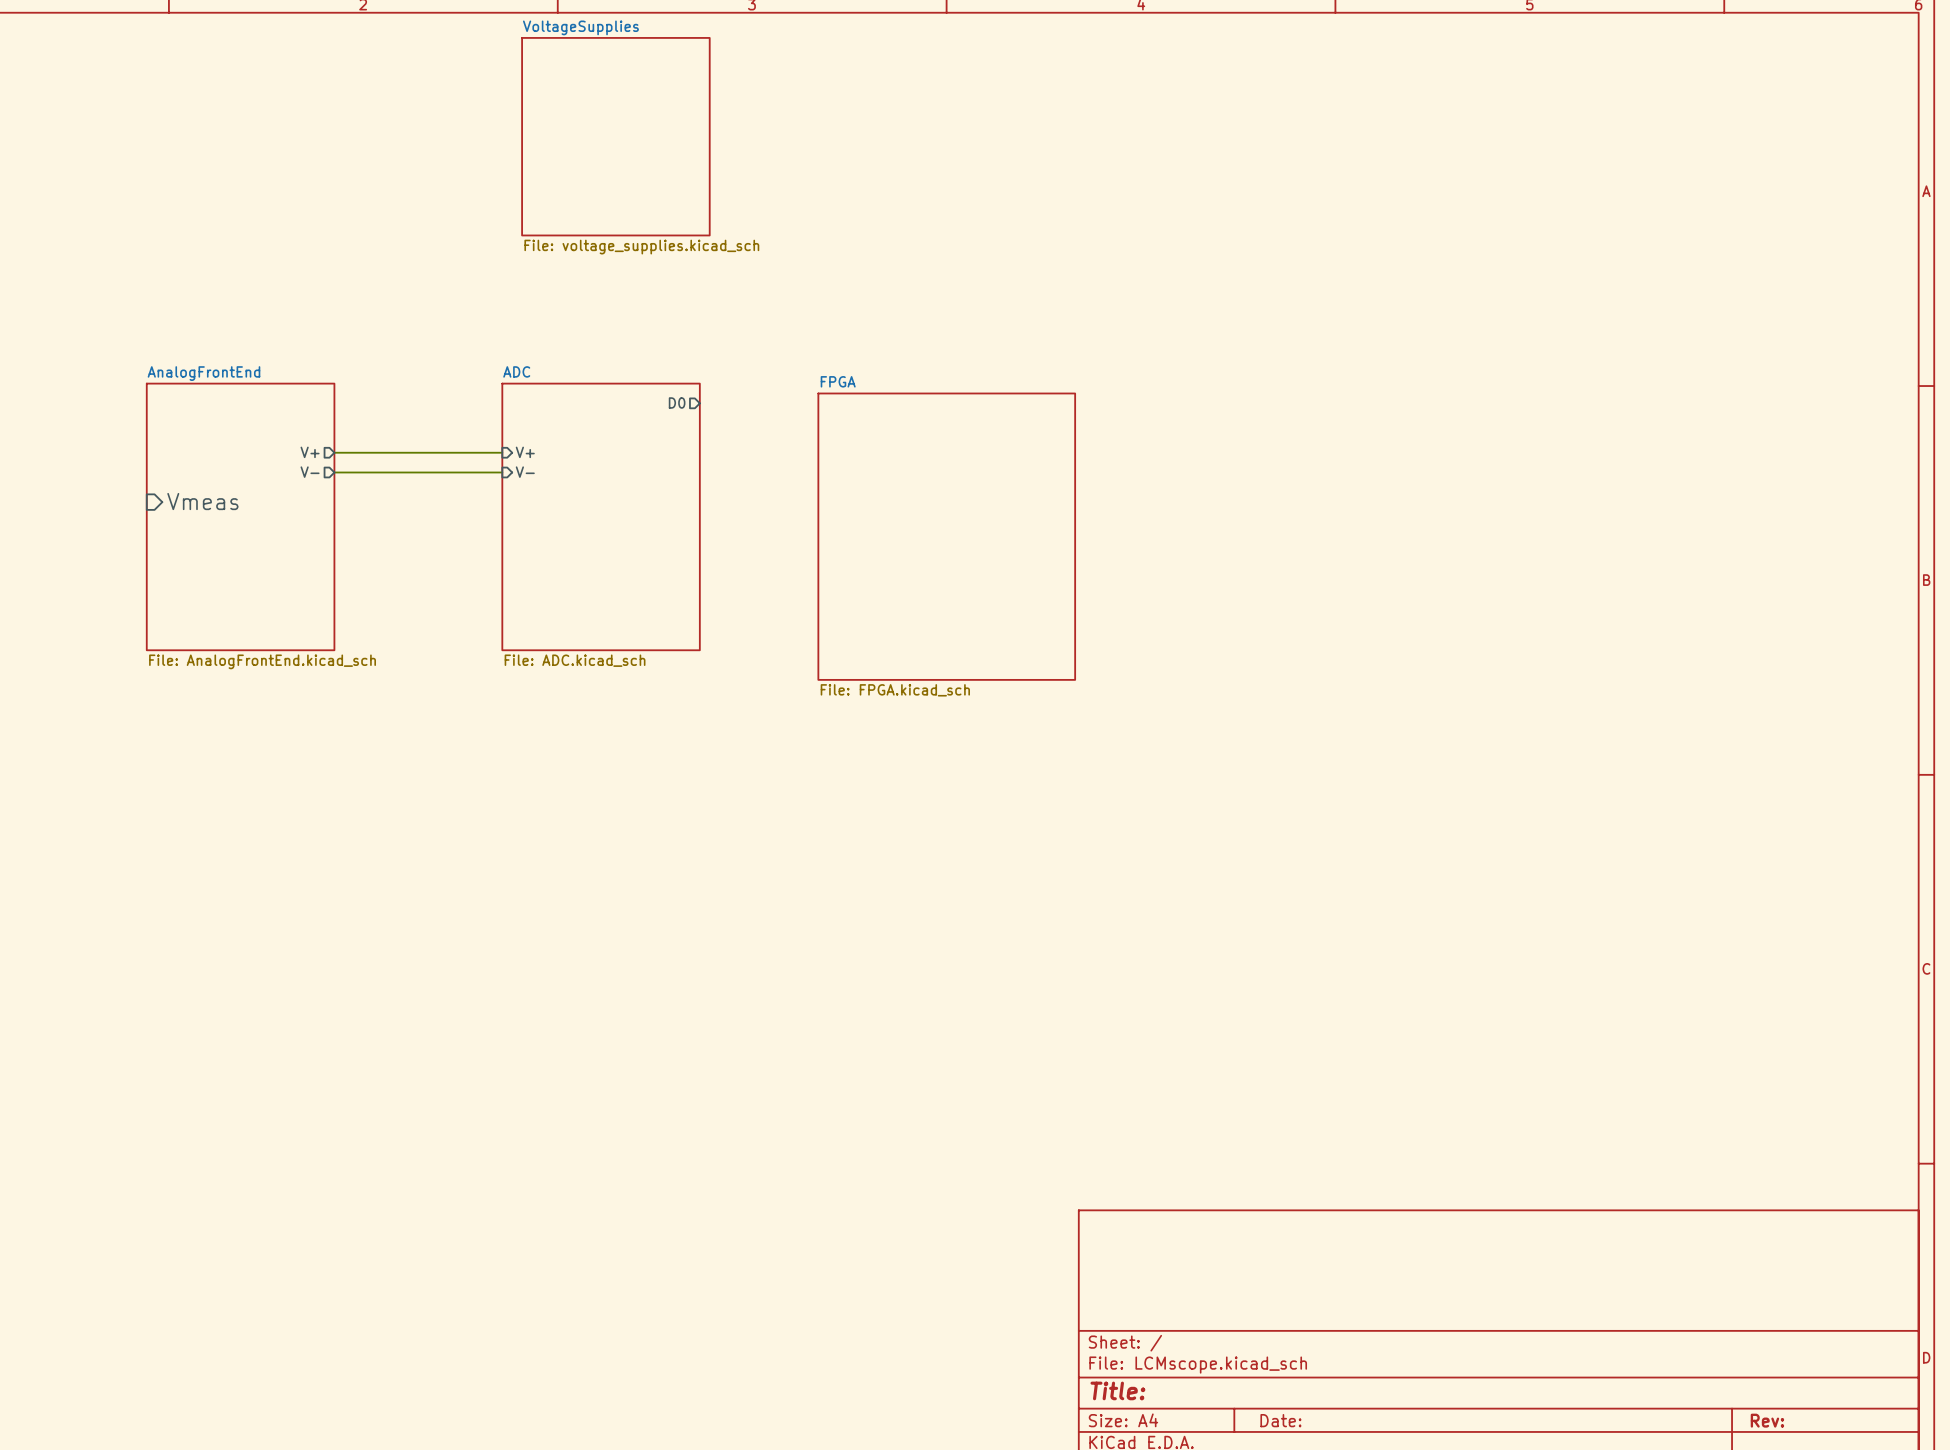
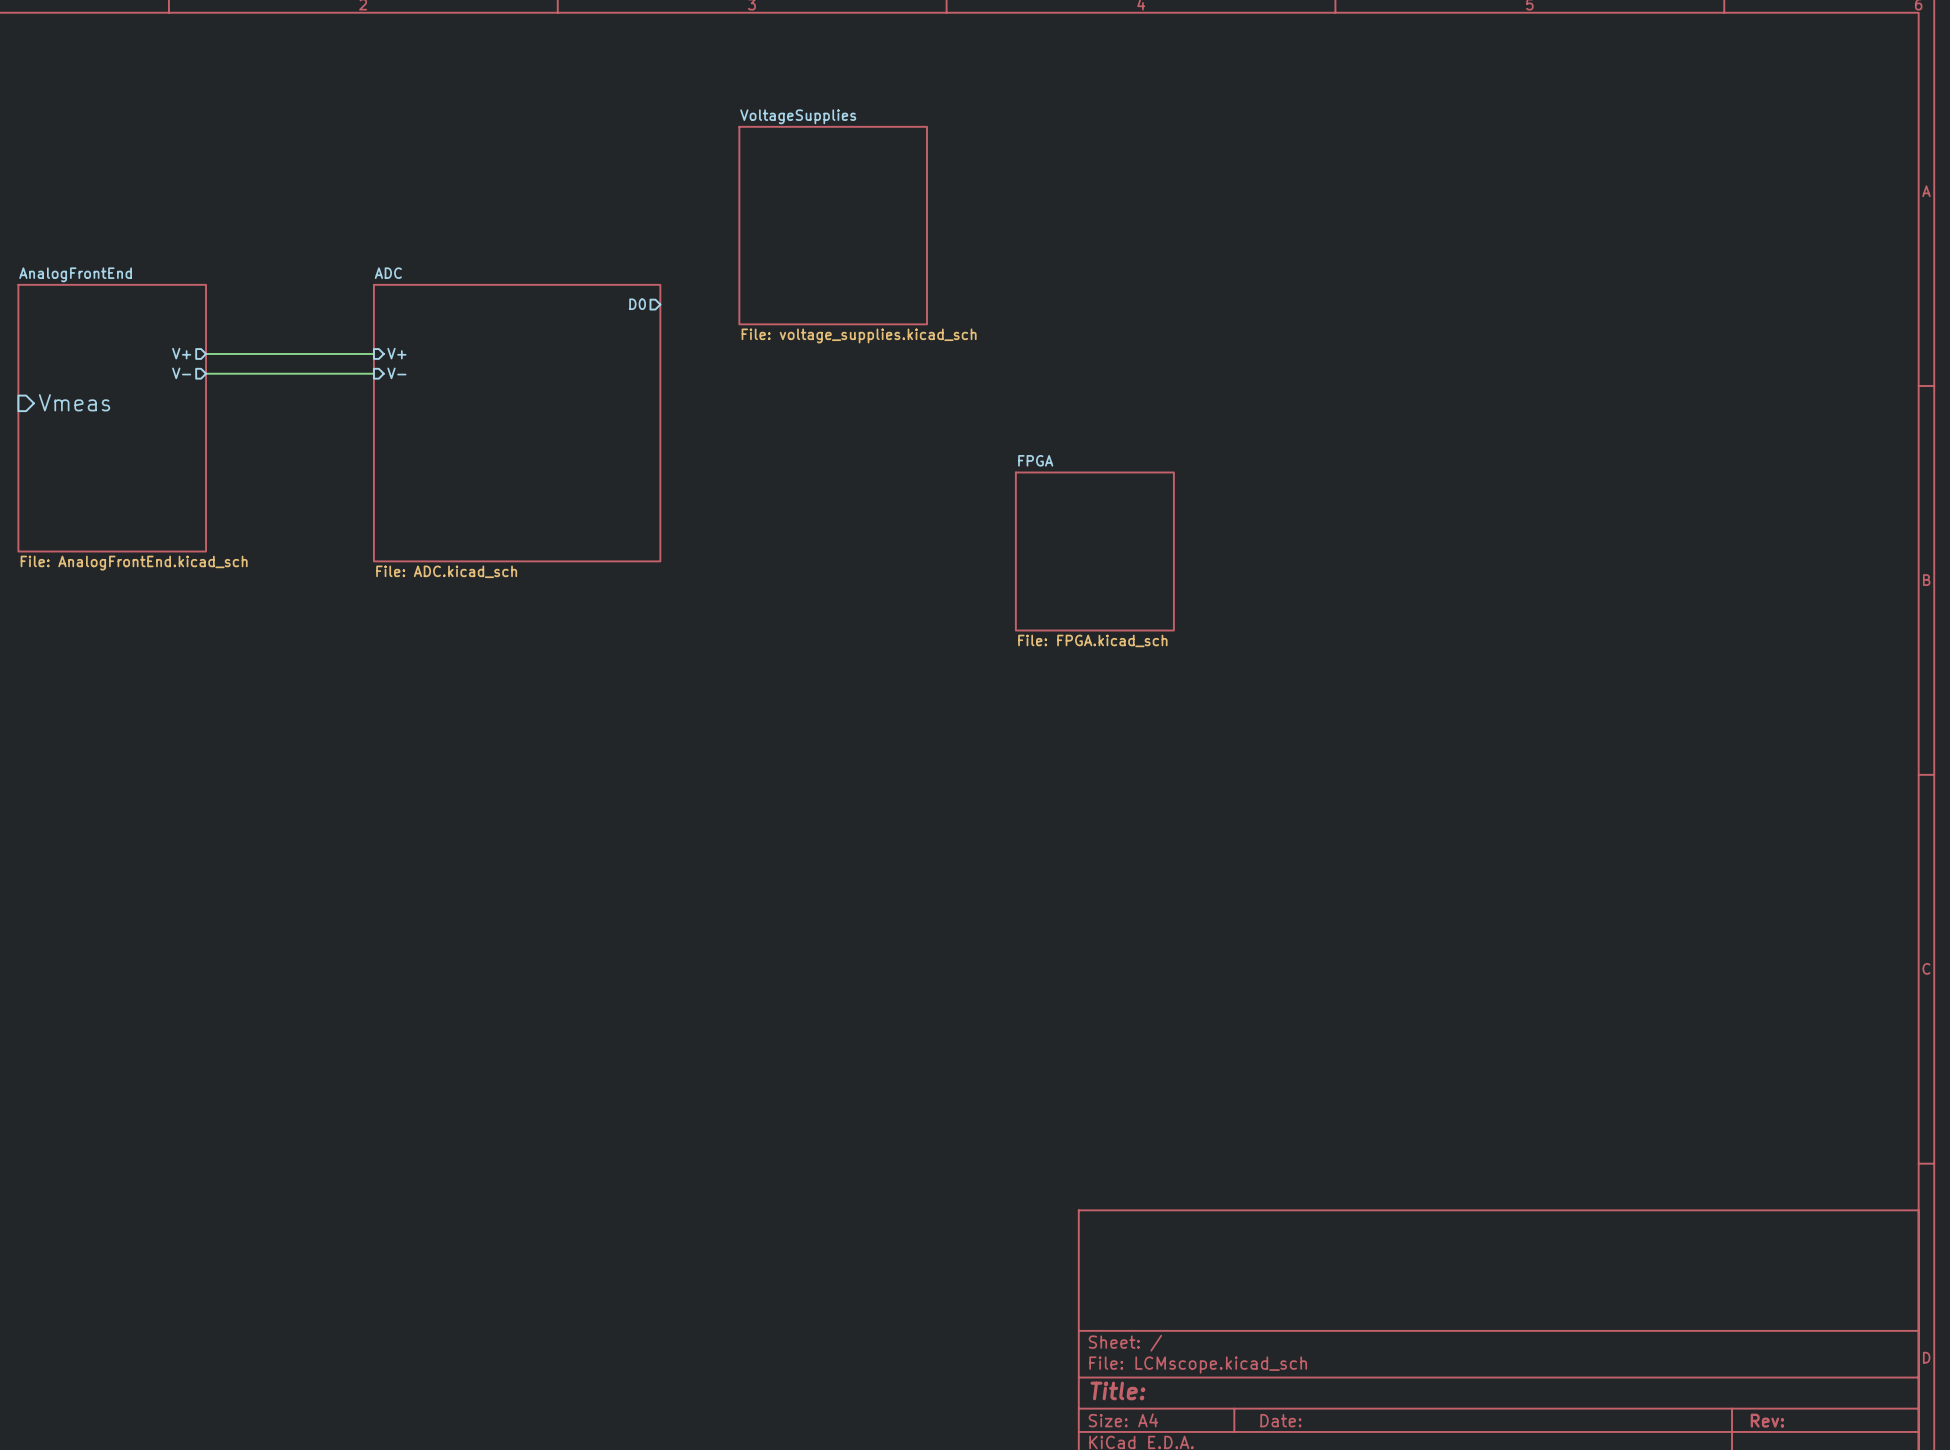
sheet VoltageSupplies: File: voltage_supplies.kicad_sch (615, 136) -> none
sheet VoltageSupplies: none -> File: voltage_supplies.kicad_sch (833, 225)
sheet pin: none -> V+ (181, 353)
sheet pin: none -> V+ (396, 353)
sheet pin: none -> V- (181, 373)
sheet pin: none -> V- (396, 373)
sheet pin position: D0 (677, 402) -> D0 (637, 304)
sheet ADC: none -> File: ADC.kicad_sch (517, 423)
sheet pin: V+ (310, 452) -> none
wire: (334, 452) (502, 452) -> (206, 353) (373, 353)
sheet pin: V+ (525, 452) -> none
sheet pin: V- (310, 472) -> none
wire: (334, 472) (502, 472) -> (206, 373) (373, 373)
sheet pin: V- (525, 472) -> none
sheet pin position: Vmeas (202, 501) -> Vmeas (74, 402)
sheet AnalogFrontEnd position: (240, 516) -> (112, 418)
sheet ADC: File: ADC.kicad_sch (601, 516) -> none
sheet FPGA: File: FPGA.kicad_sch (946, 536) -> none
sheet FPGA: none -> File: FPGA.kicad_sch (1094, 551)

